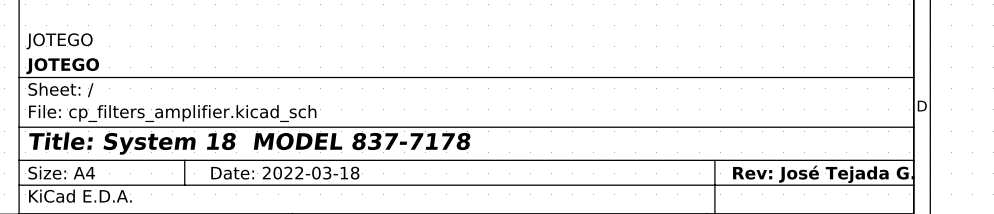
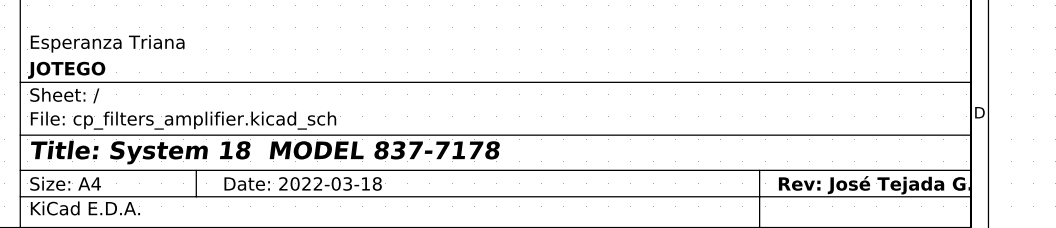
title block: JOTEGO (59, 41) -> Esperanza Triana (107, 43)

